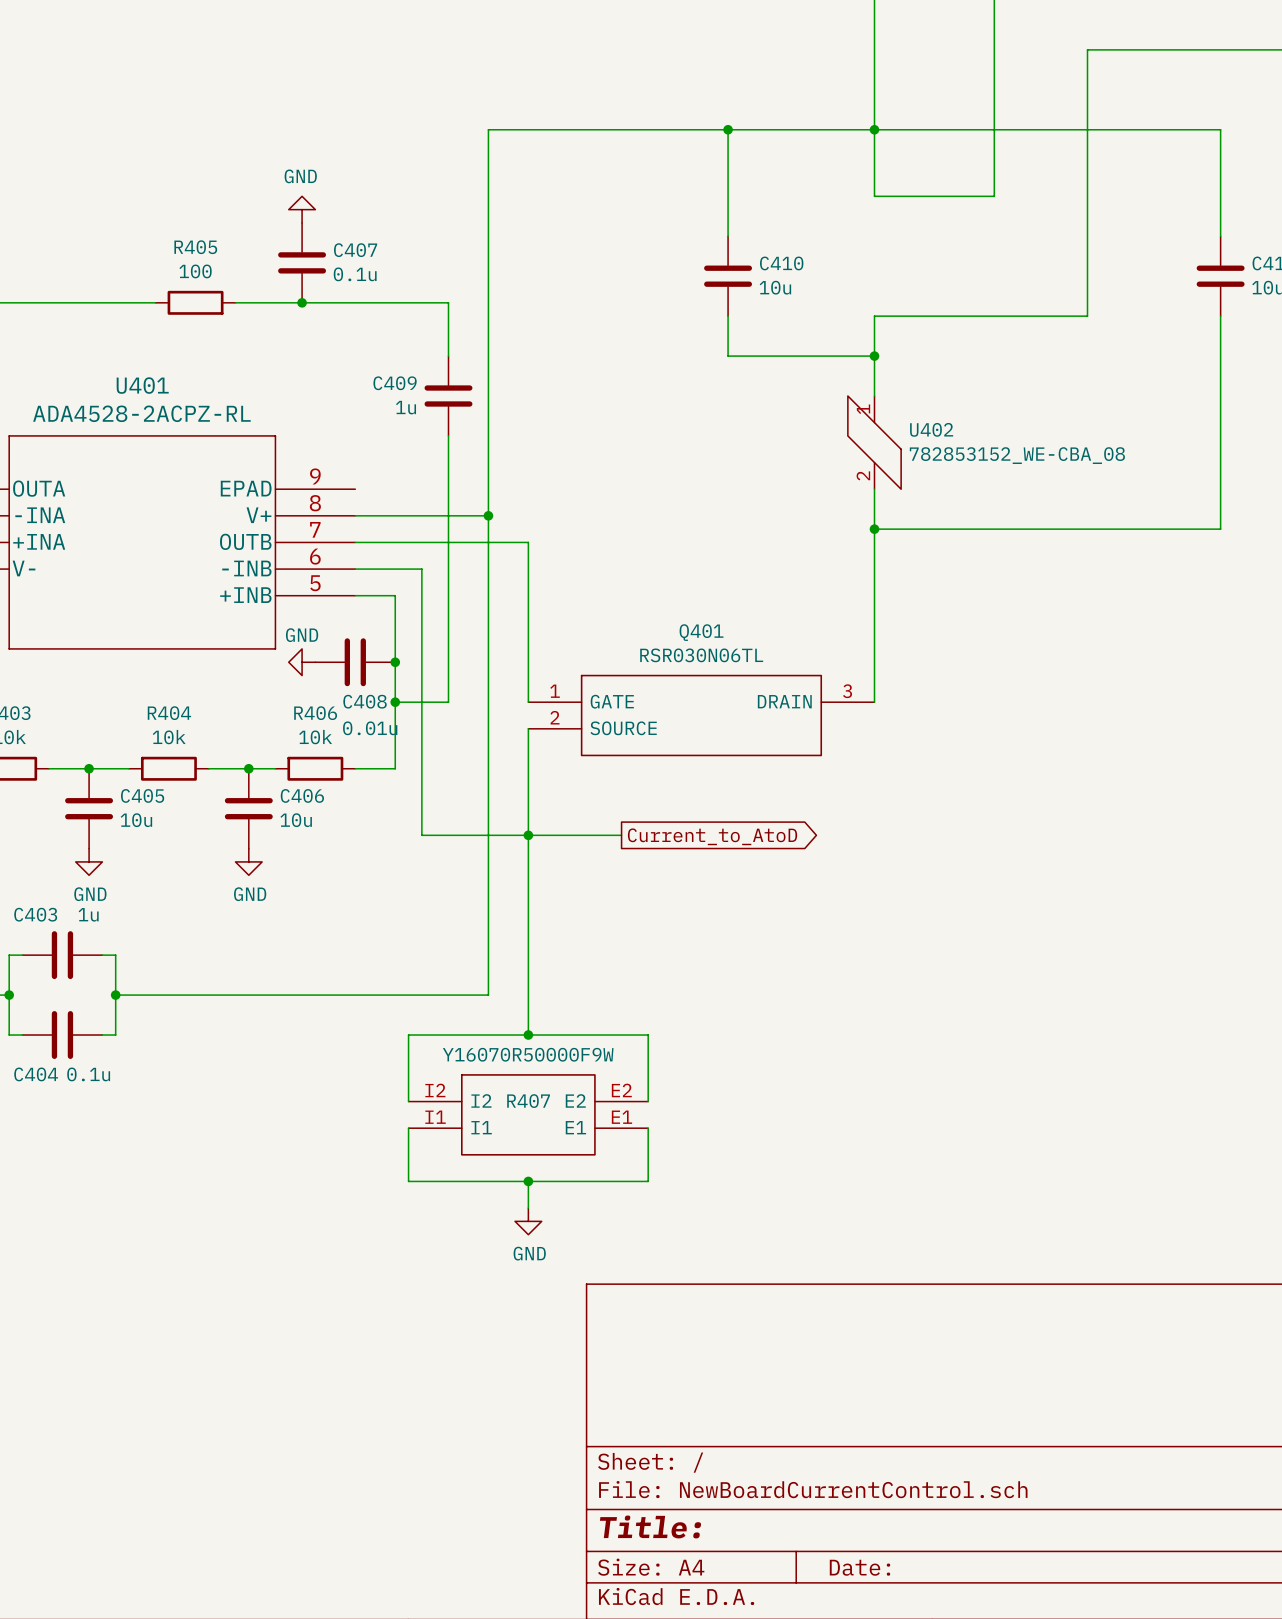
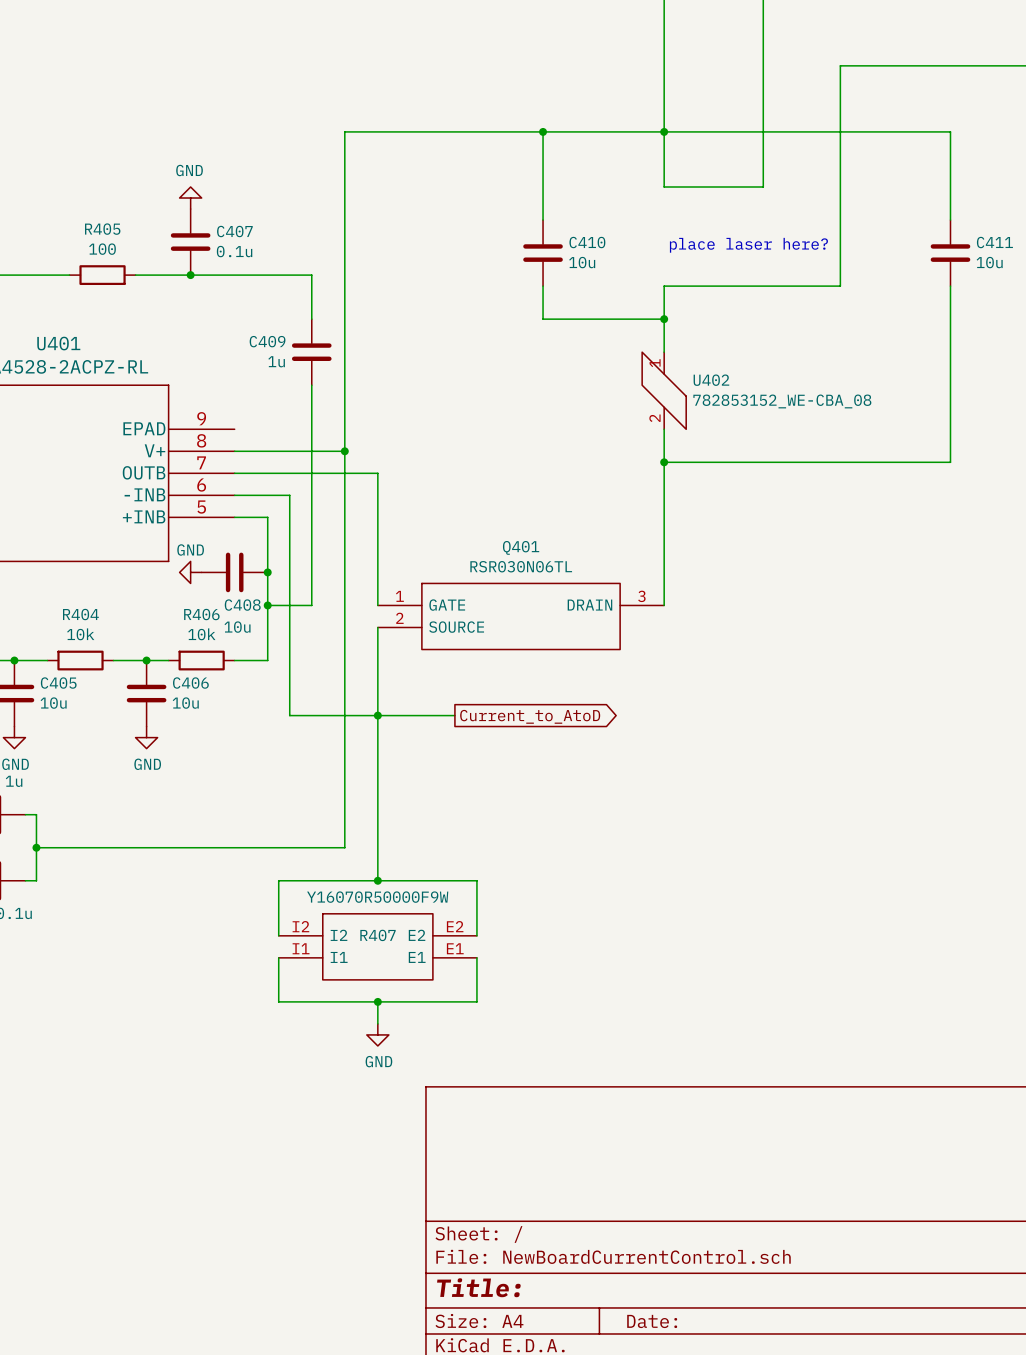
text: none -> place laser here? (748, 245)
C408 value: 0.01u (370, 728) -> 10u (237, 627)

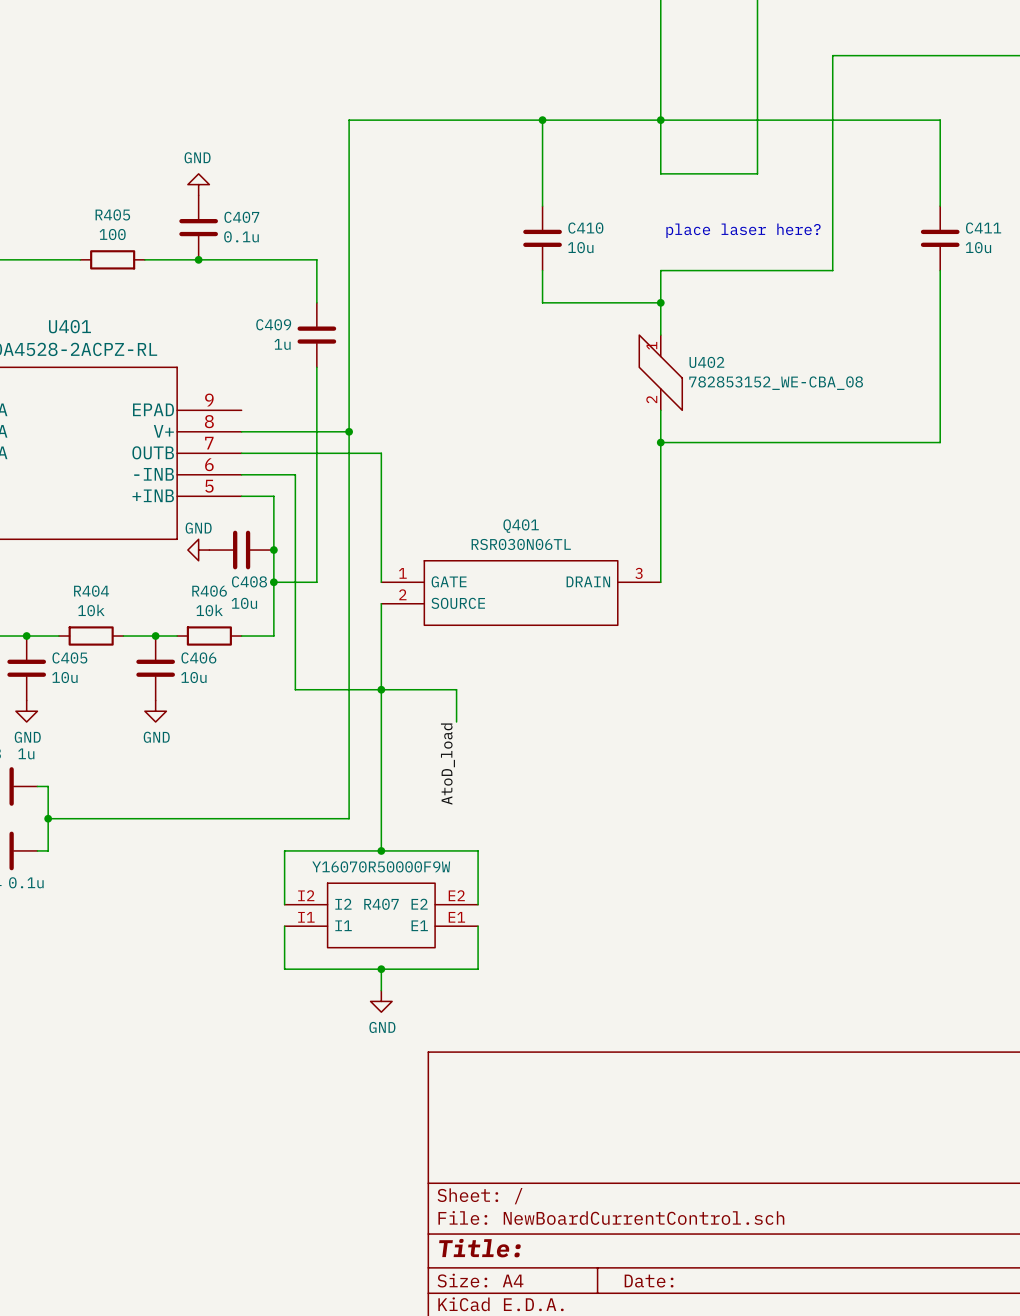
wire: none -> (456, 689) (456, 721)
global label: Current_to_AtoD (530, 716) -> none
label: none -> AtoD_load (447, 764)

